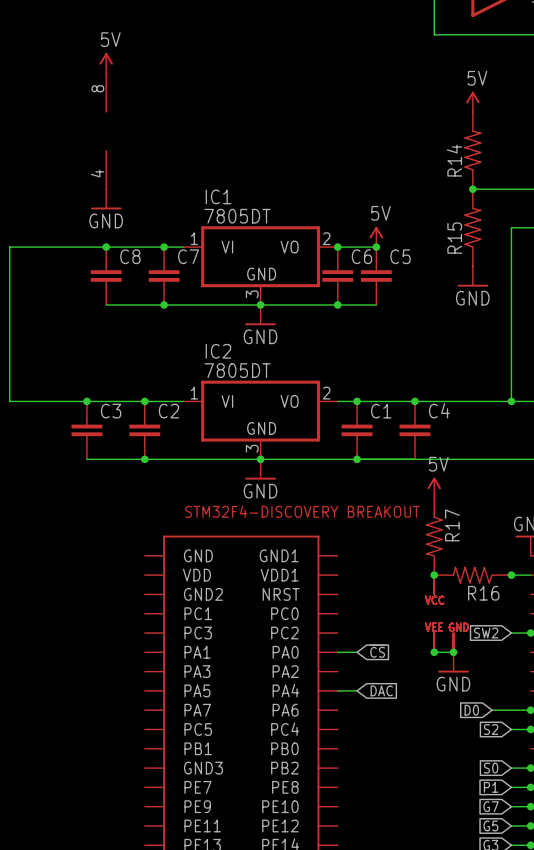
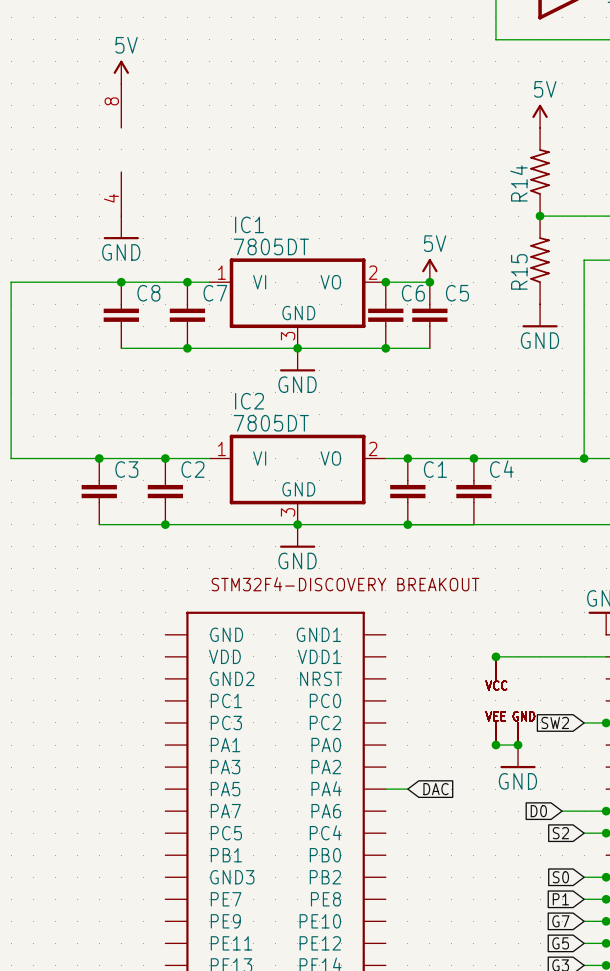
power symbol: 5V (434, 487) -> none
R17: (434, 536) -> none
R16: (472, 575) -> none
junction: (511, 575) -> none
global label: ~{CS} (377, 651) -> none
wire: (337, 652) (357, 652) -> none

